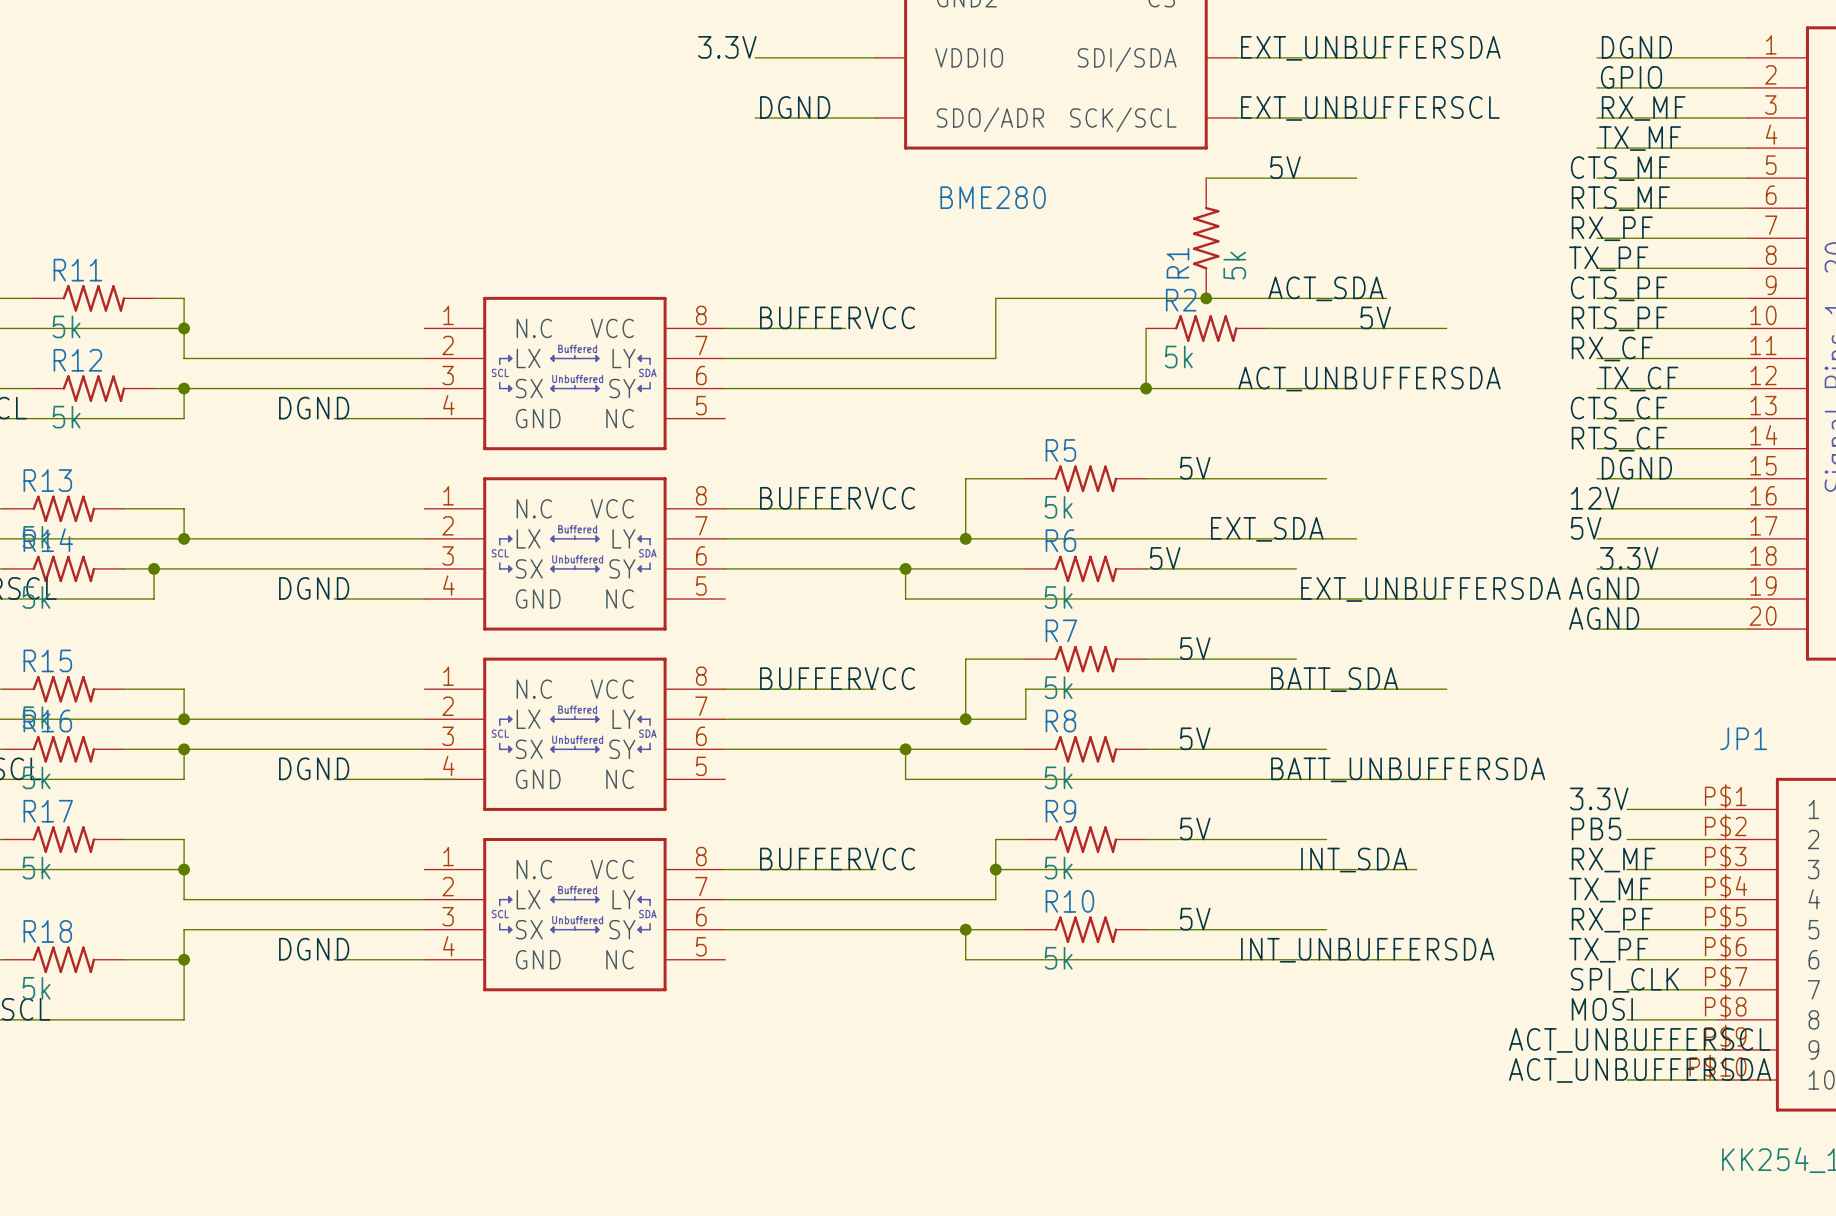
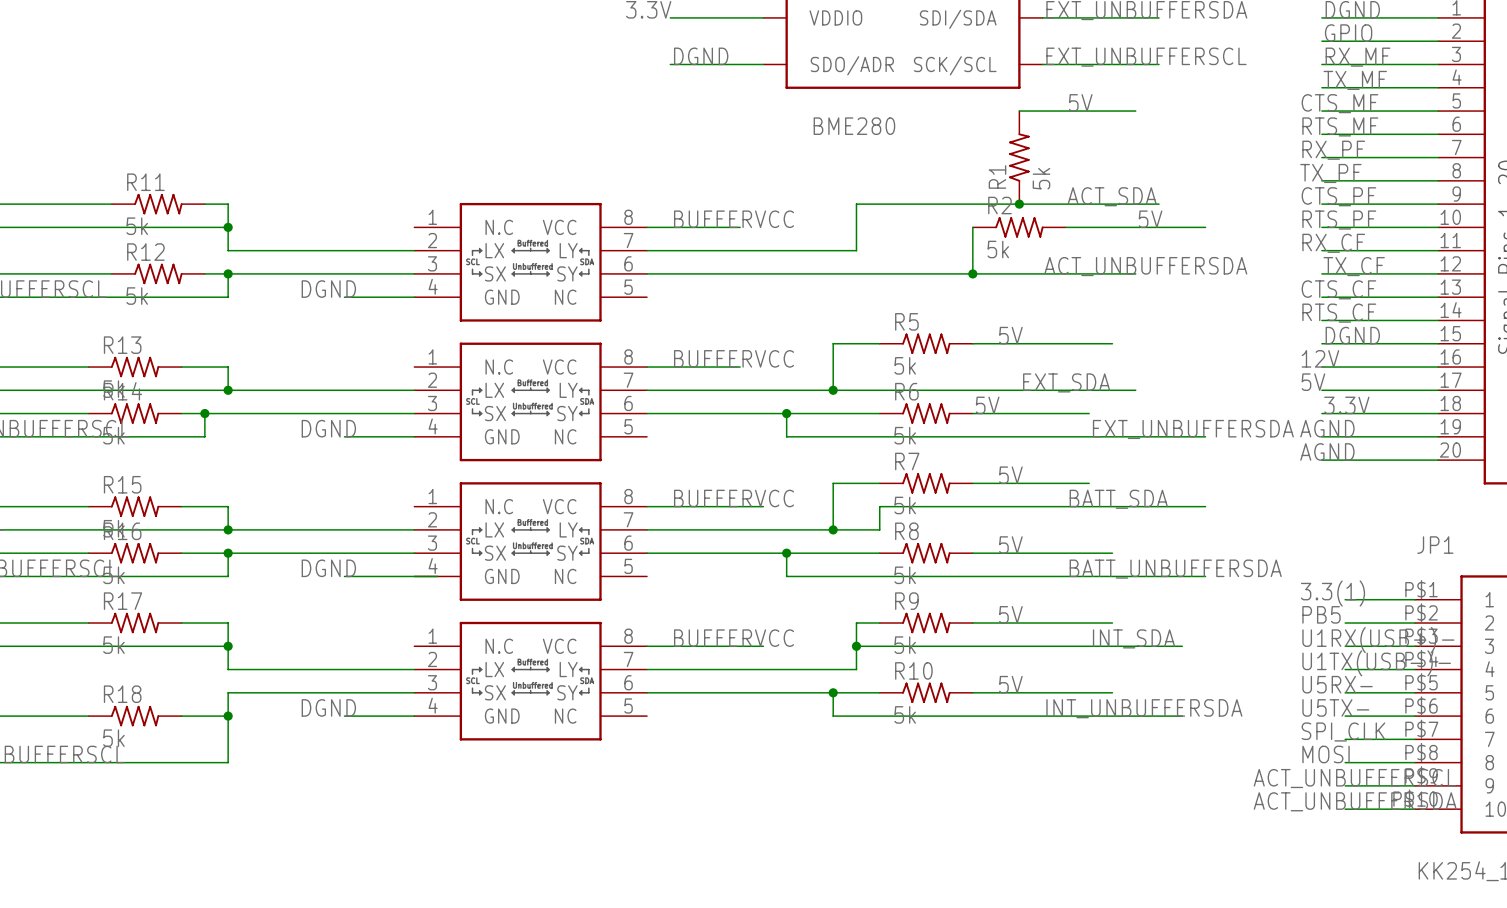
label: 3.3V (1599, 798) -> 3.3(1) (1333, 593)
label: RX_MF (1613, 860) -> U1RX(USB+)- (1378, 640)
label: TX_MF (1610, 890) -> U1TX(USB-)- (1376, 663)
label: RX_PF (1612, 920) -> U5RX- (1337, 684)
label: TX_PF (1608, 950) -> U5TX- (1335, 707)

